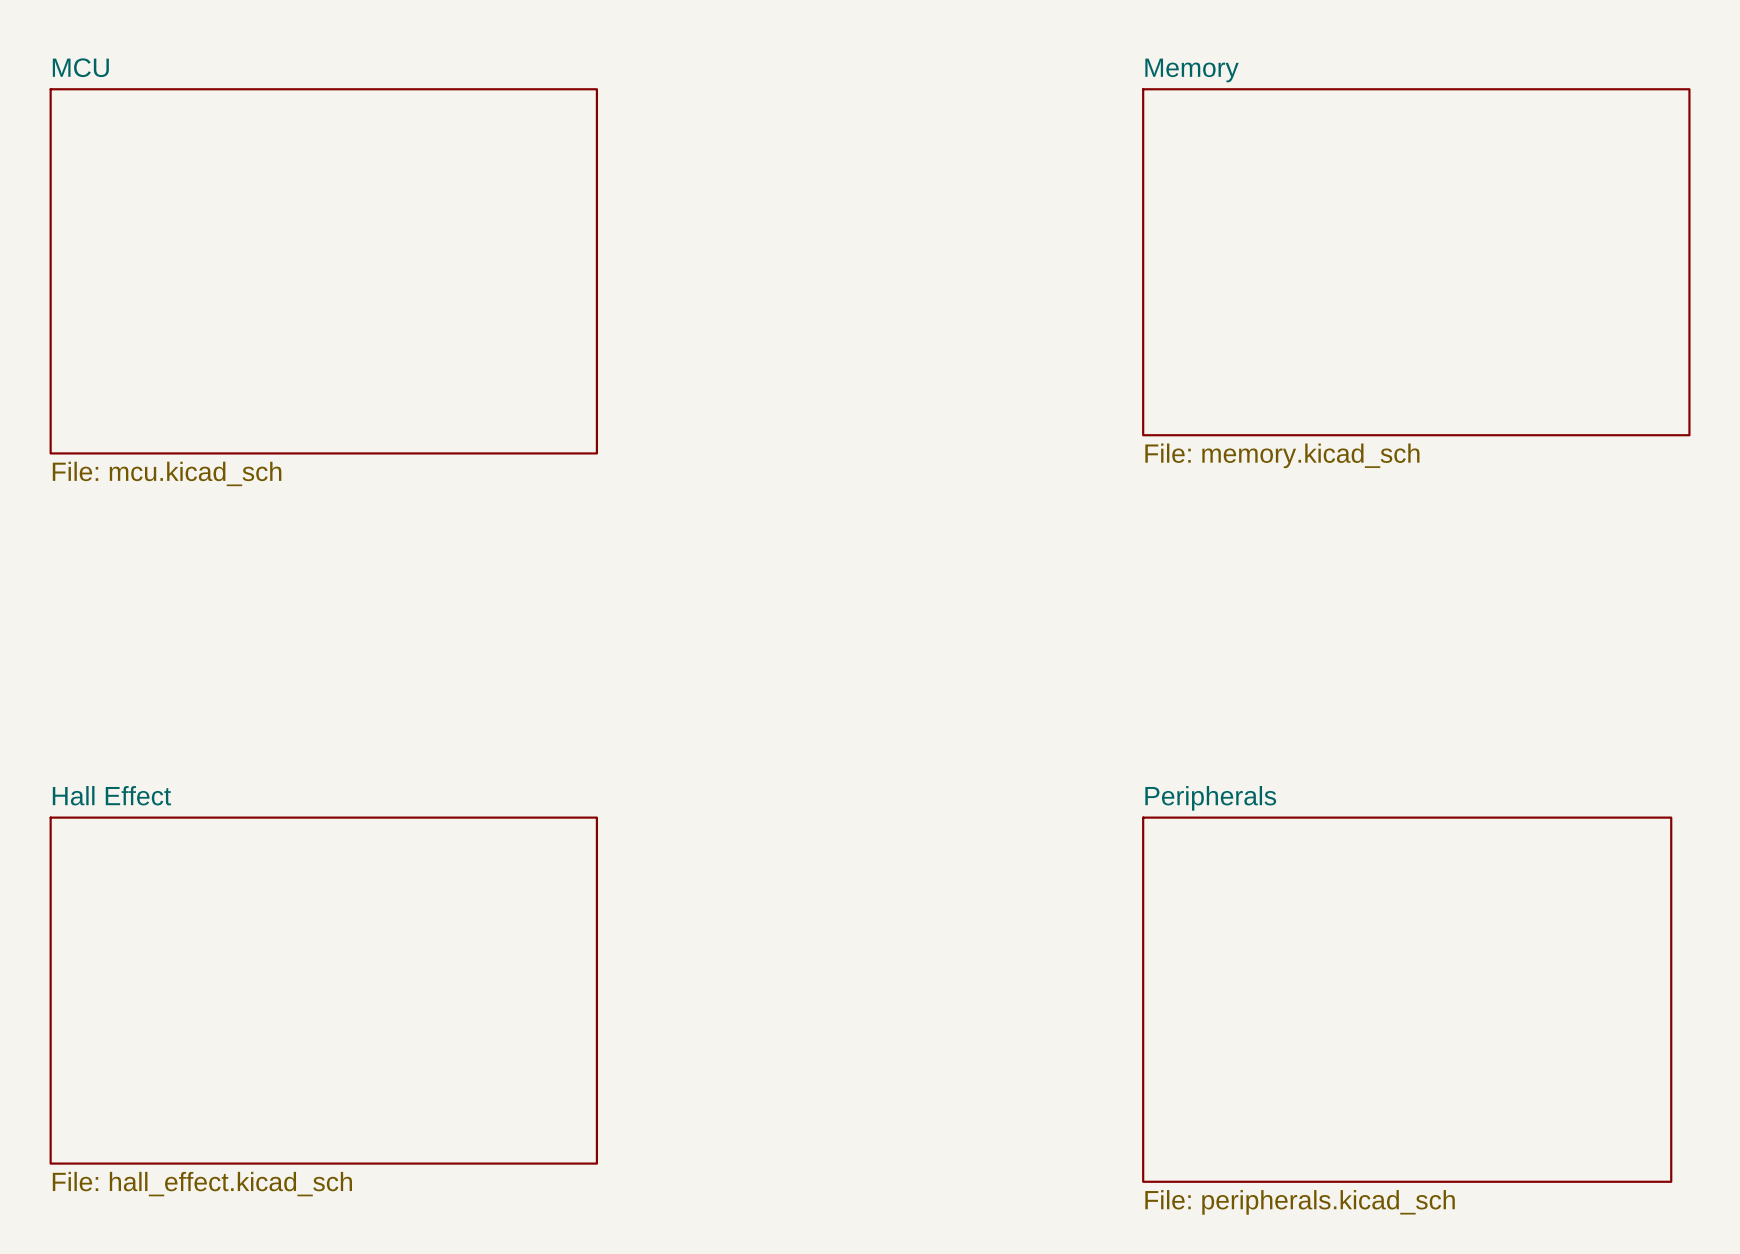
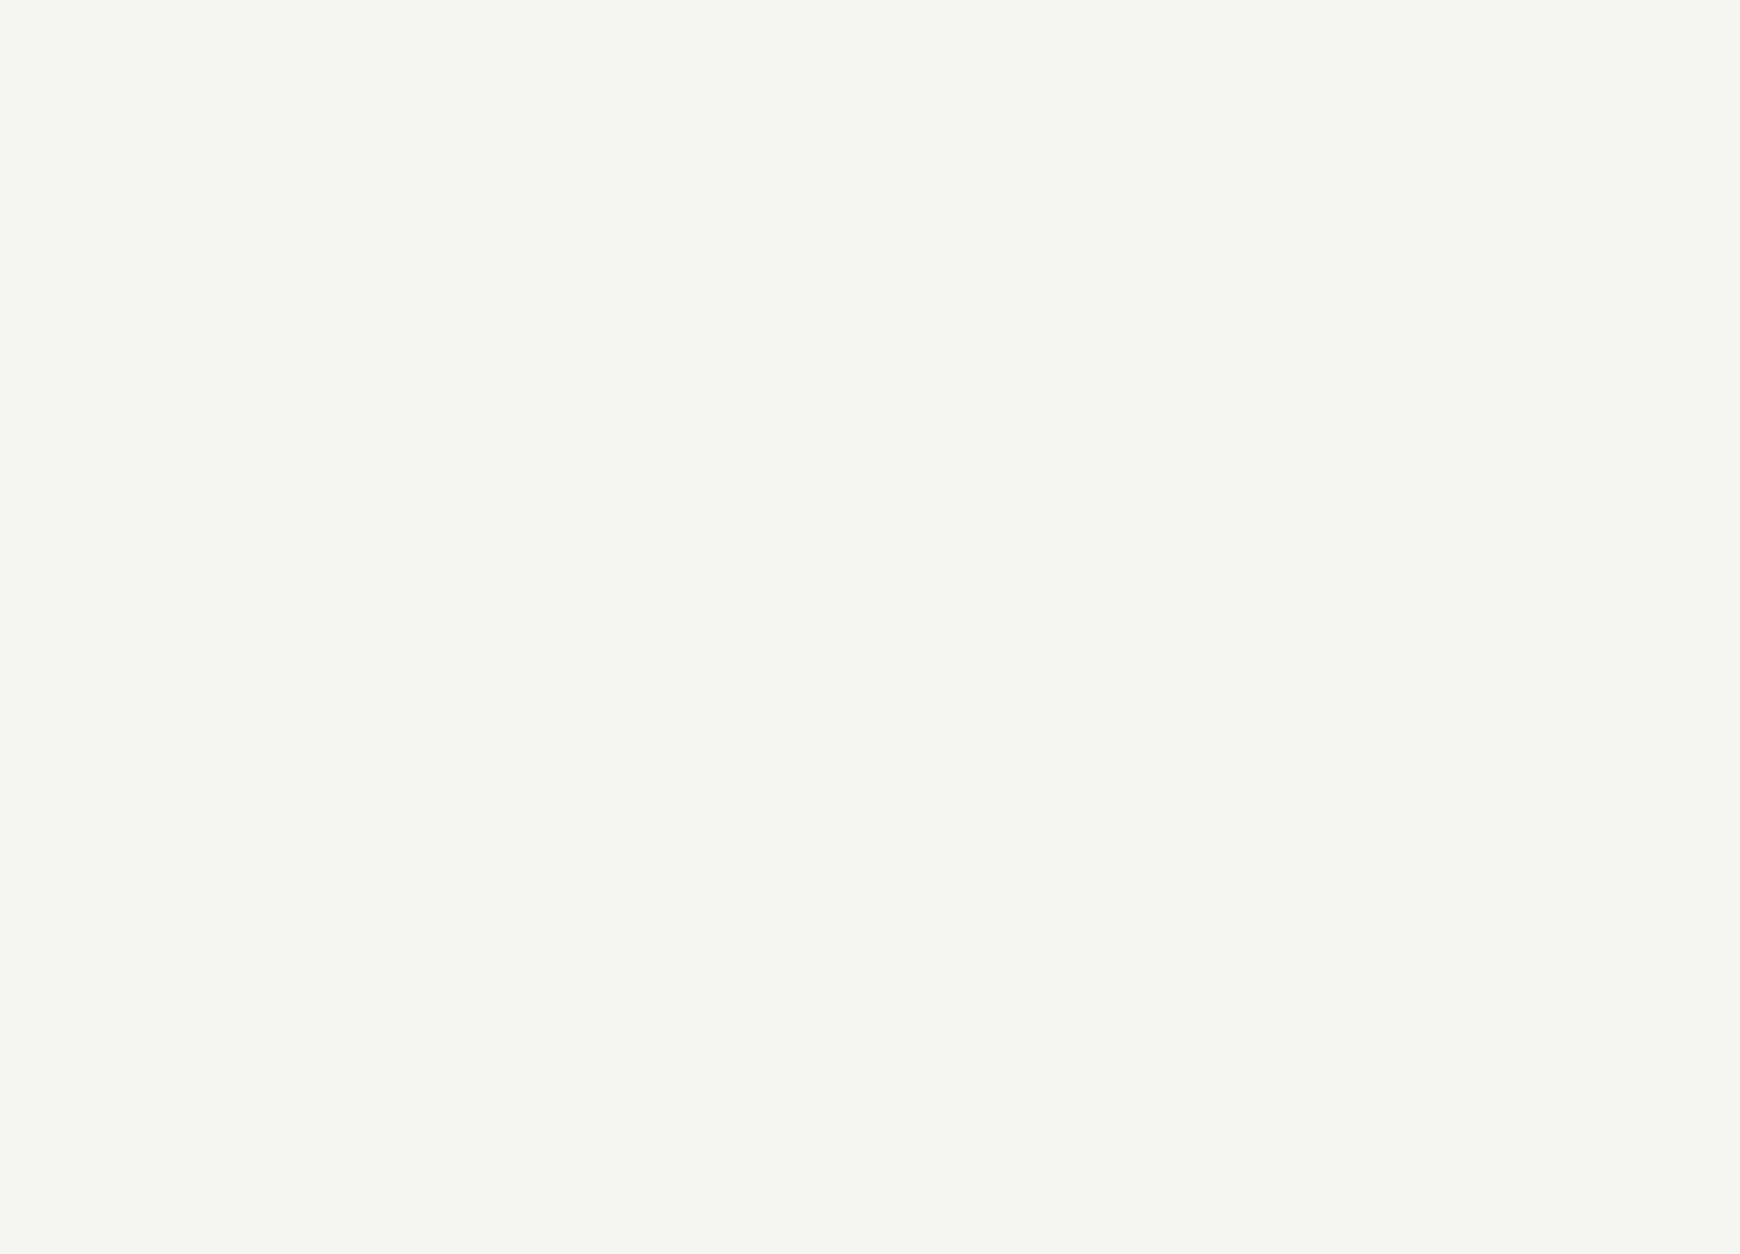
sheet Memory: File: memory.kicad_sch (1416, 262) -> none
sheet MCU: File: mcu.kicad_sch (323, 271) -> none
sheet Hall Effect: File: hall_effect.kicad_sch (323, 990) -> none
sheet Peripherals: File: peripherals.kicad_sch (1407, 999) -> none

